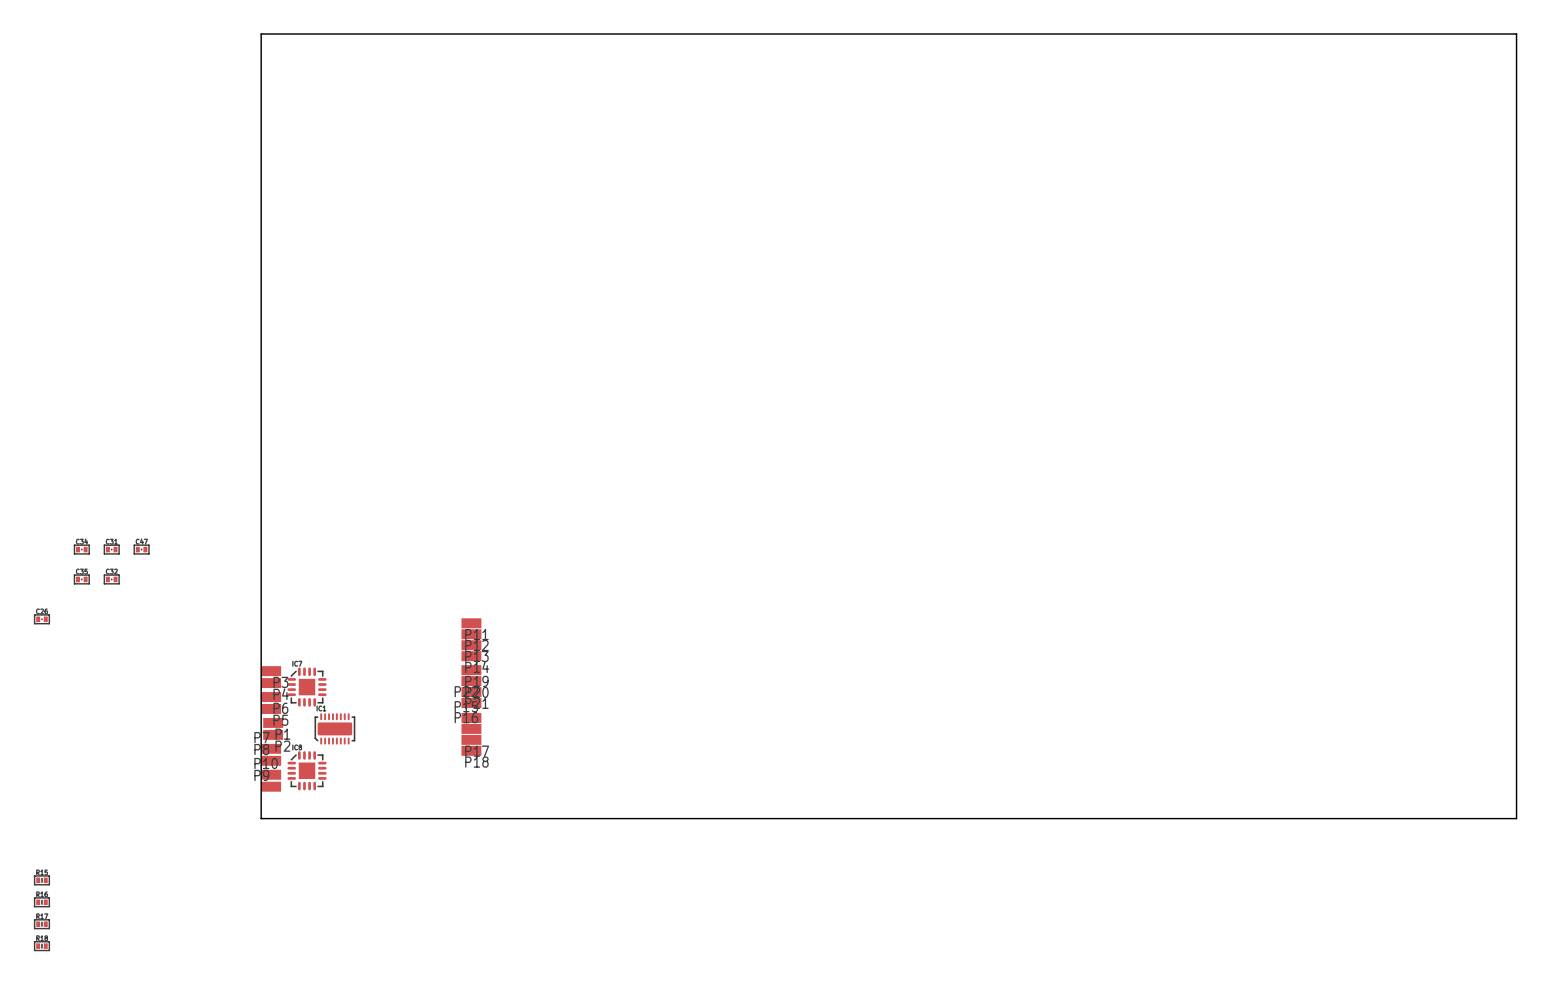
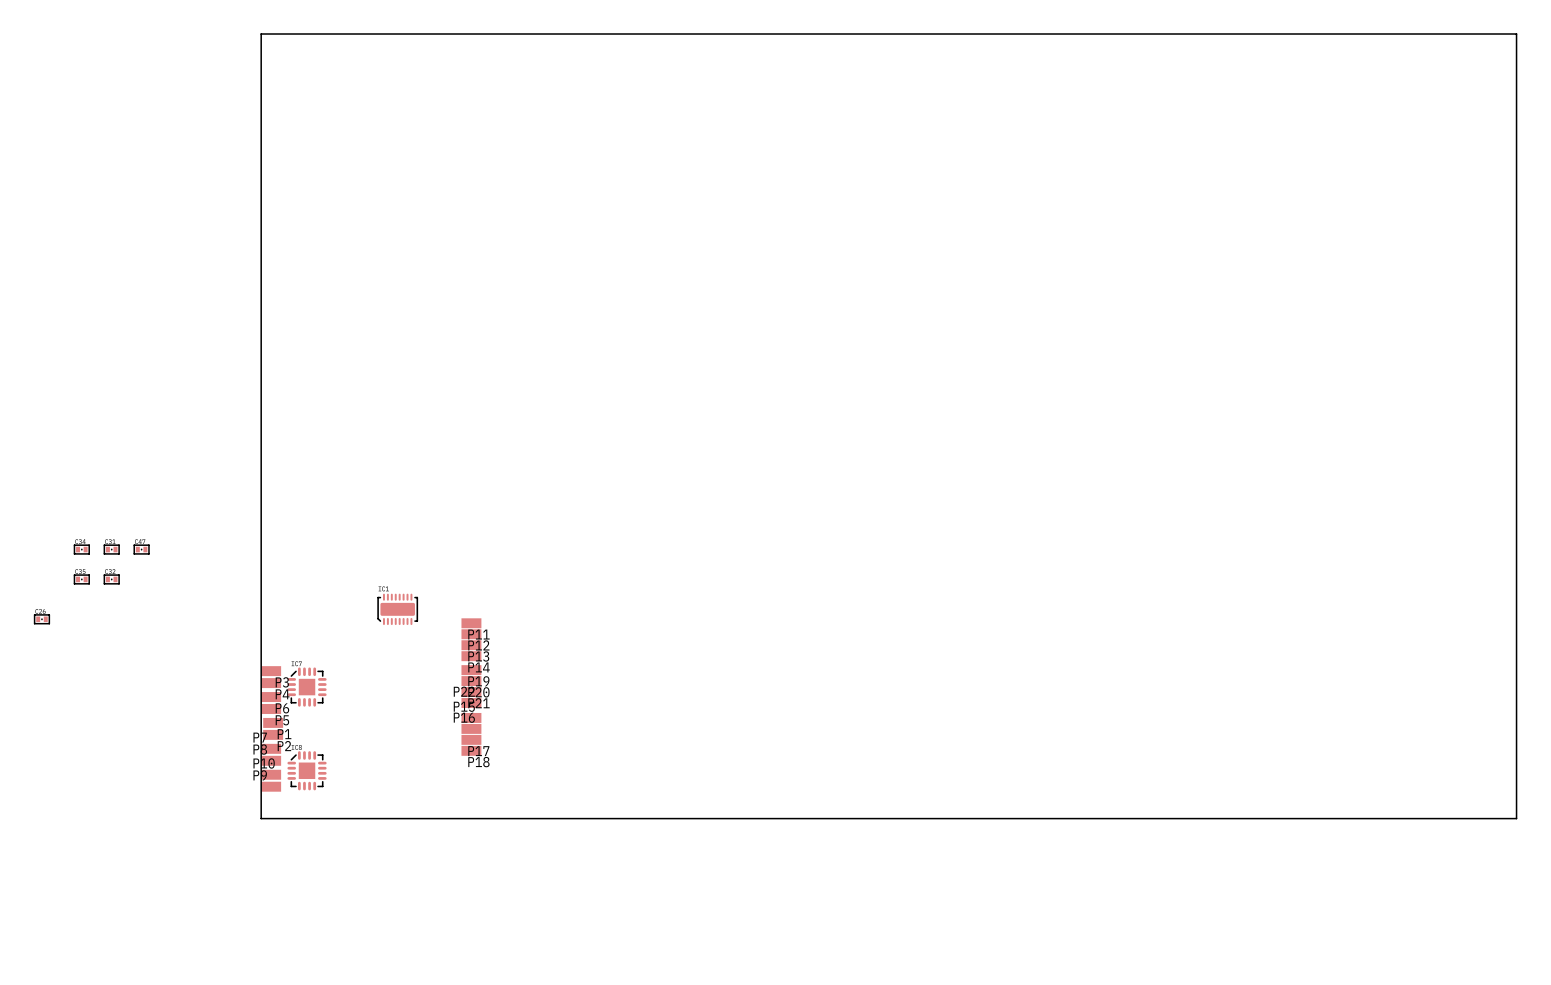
part position: (334, 728) -> (397, 609)
part: (41, 880) -> none
part: (41, 902) -> none
part: (41, 924) -> none
part: (41, 946) -> none

